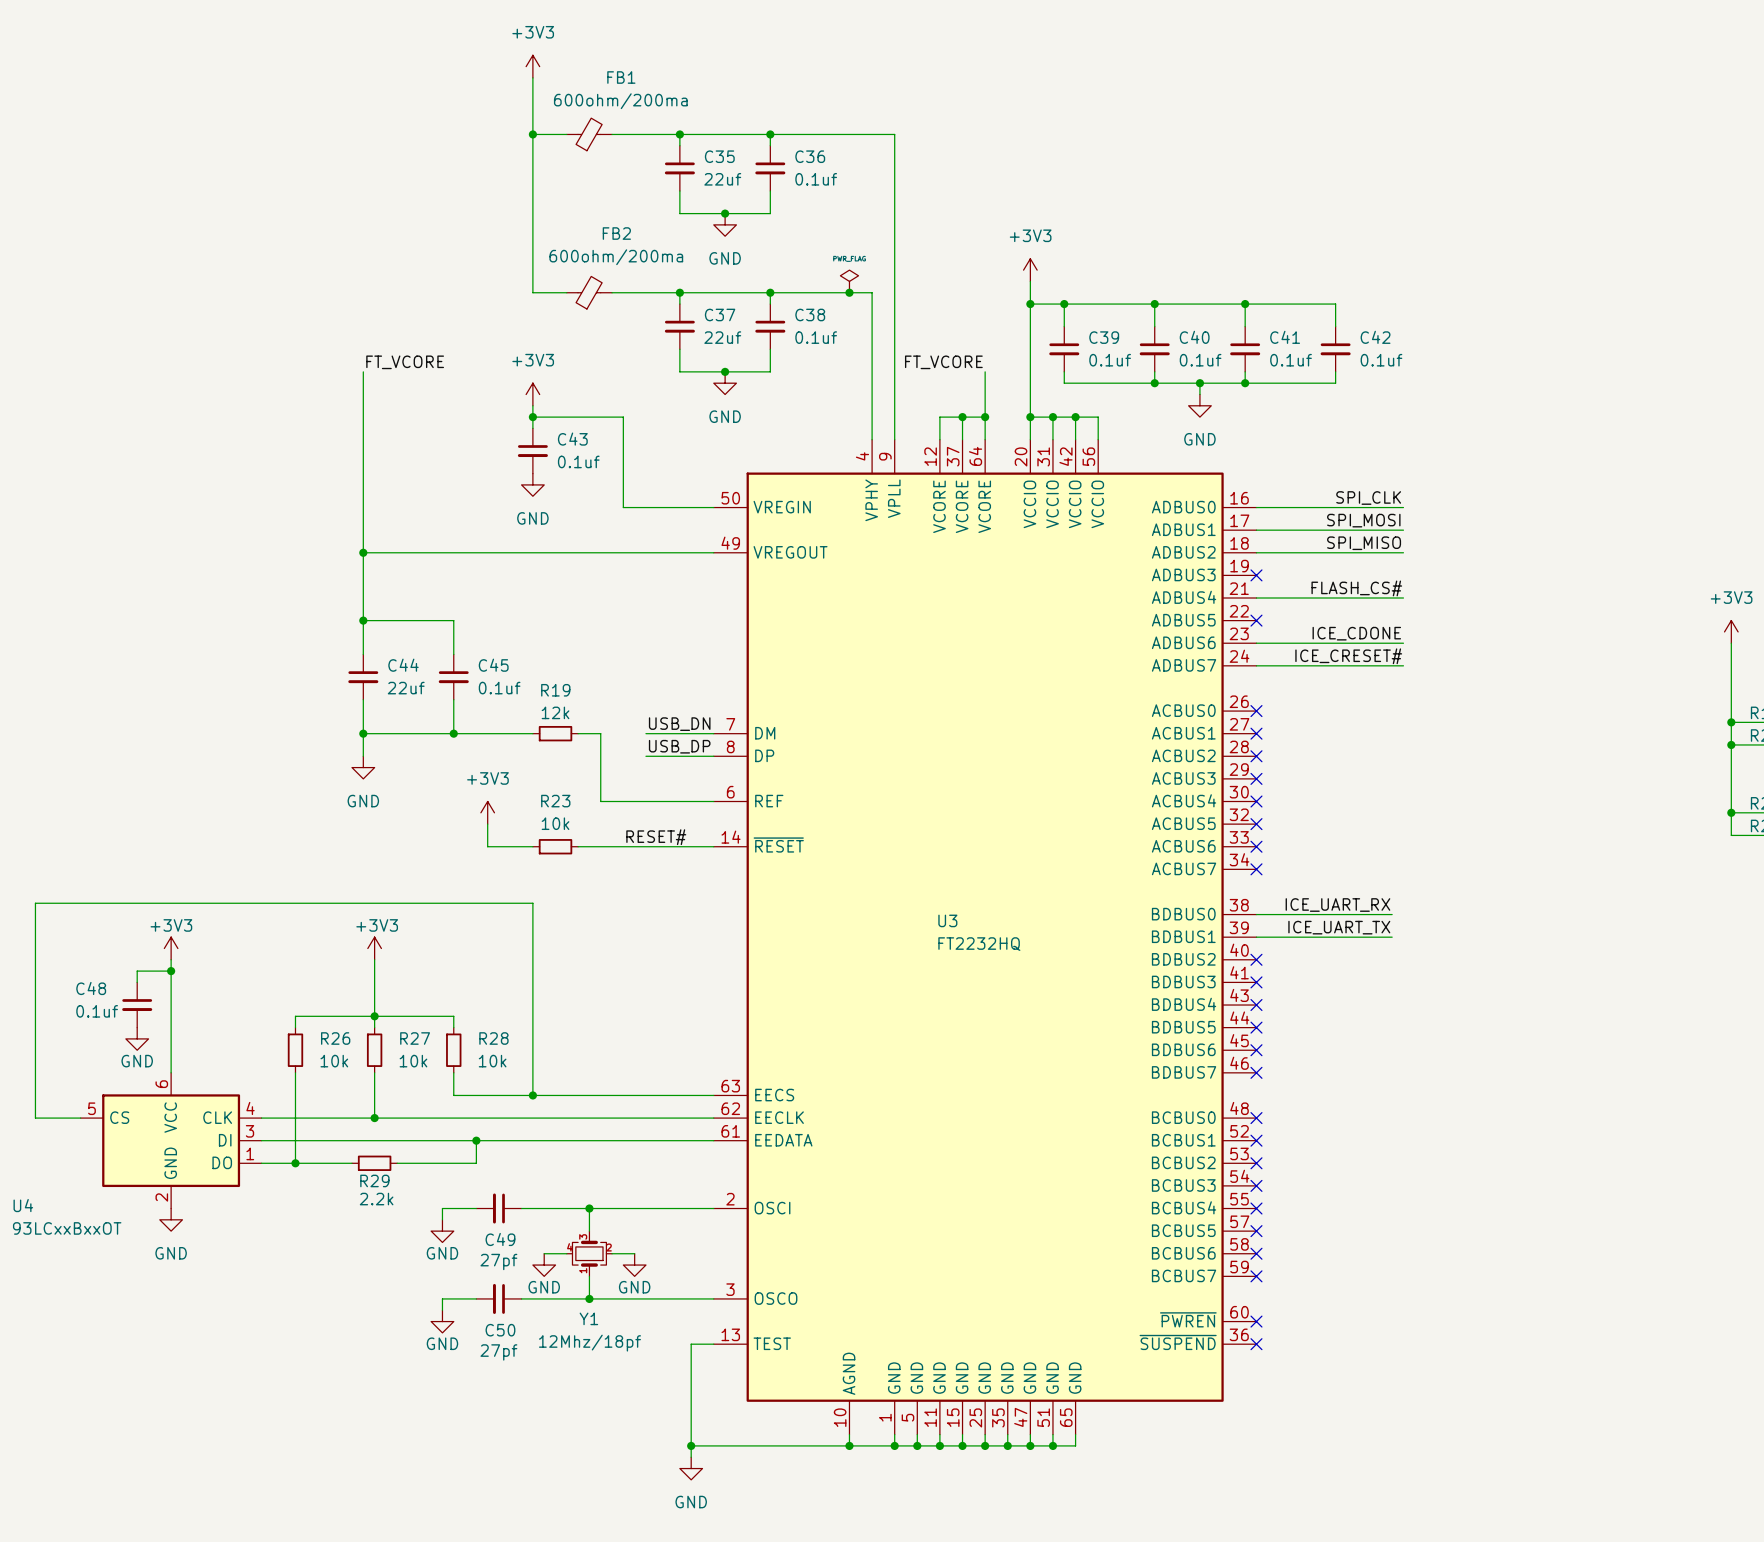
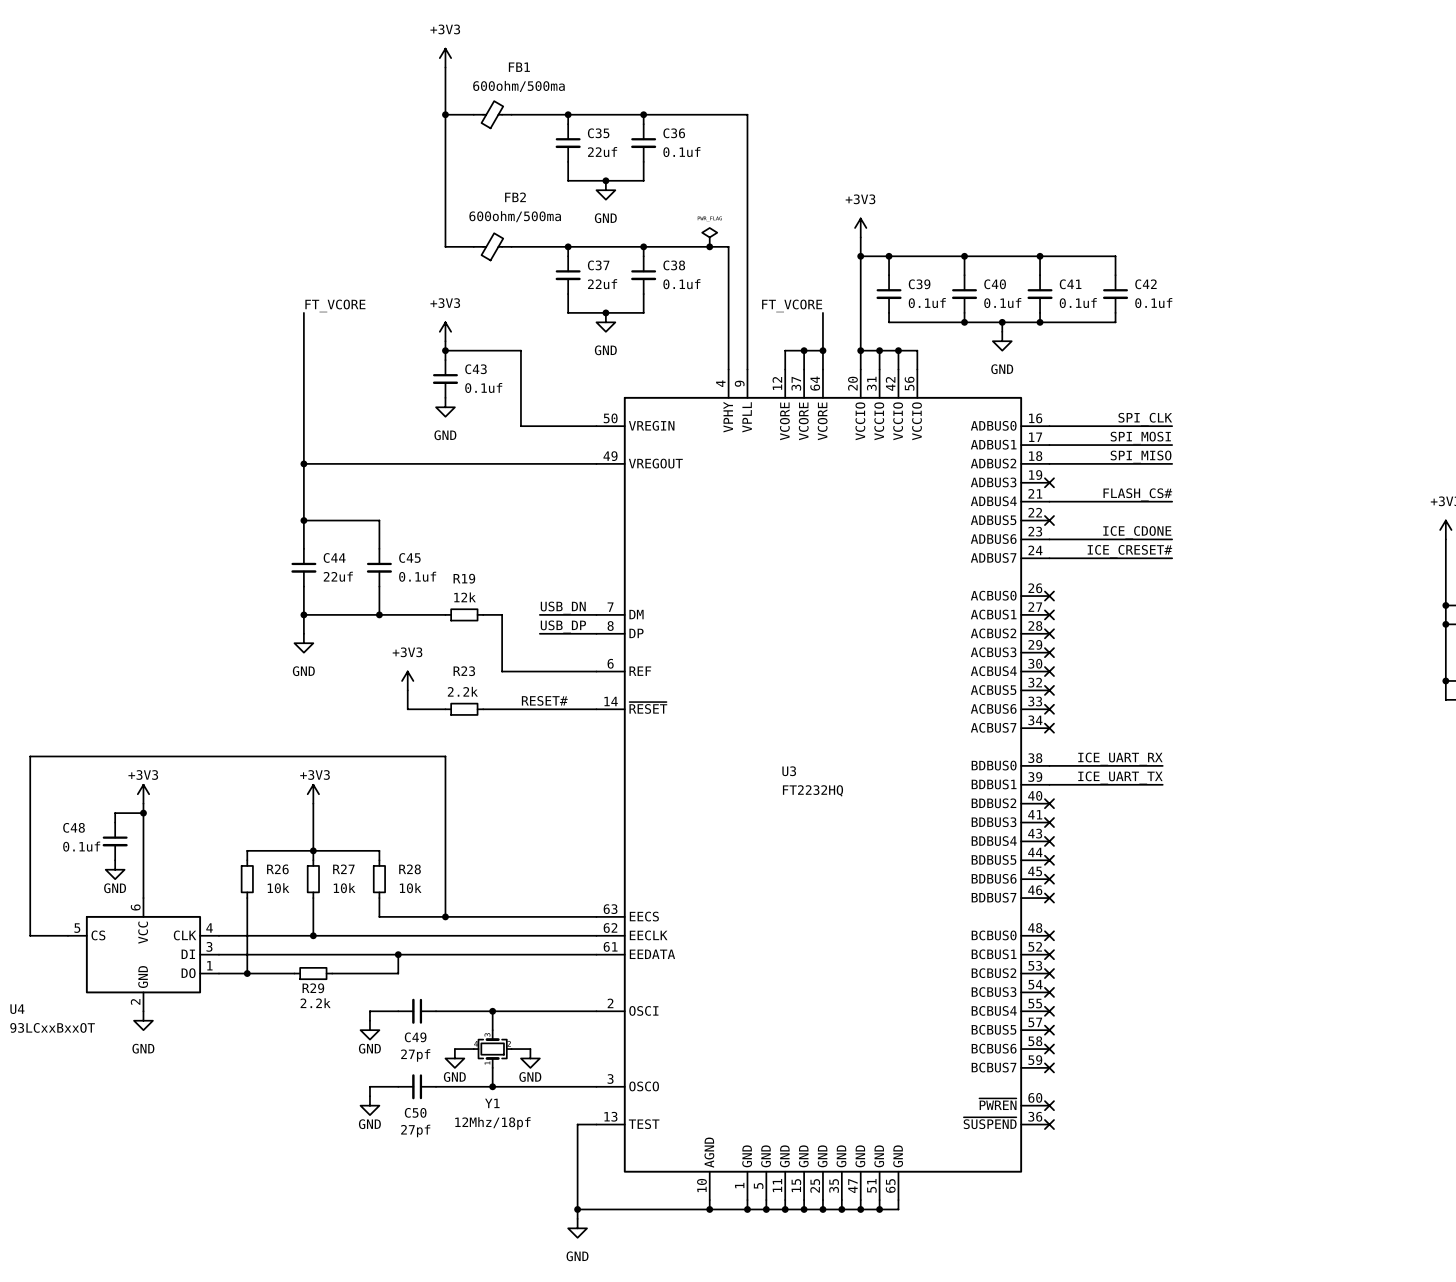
FB1 value: 600ohm/200ma (620, 101) -> 600ohm/500ma (518, 86)
FB2 value: 600ohm/200ma (616, 257) -> 600ohm/500ma (515, 216)
R23 value: 10k (555, 823) -> 2.2k (462, 691)

